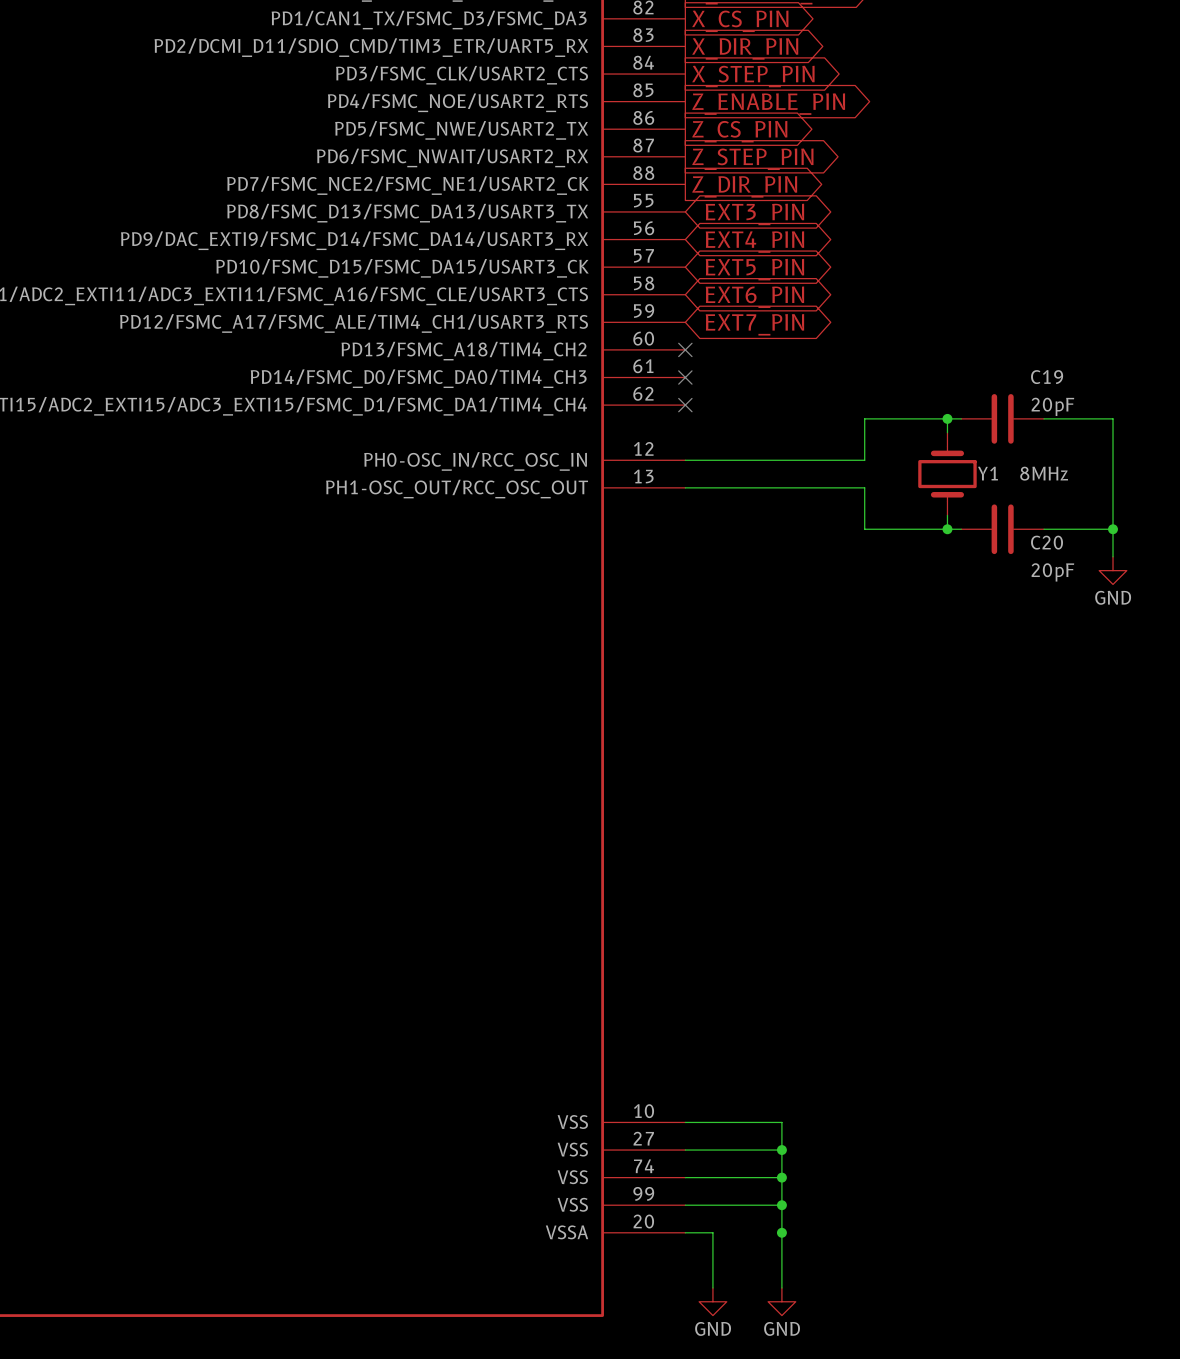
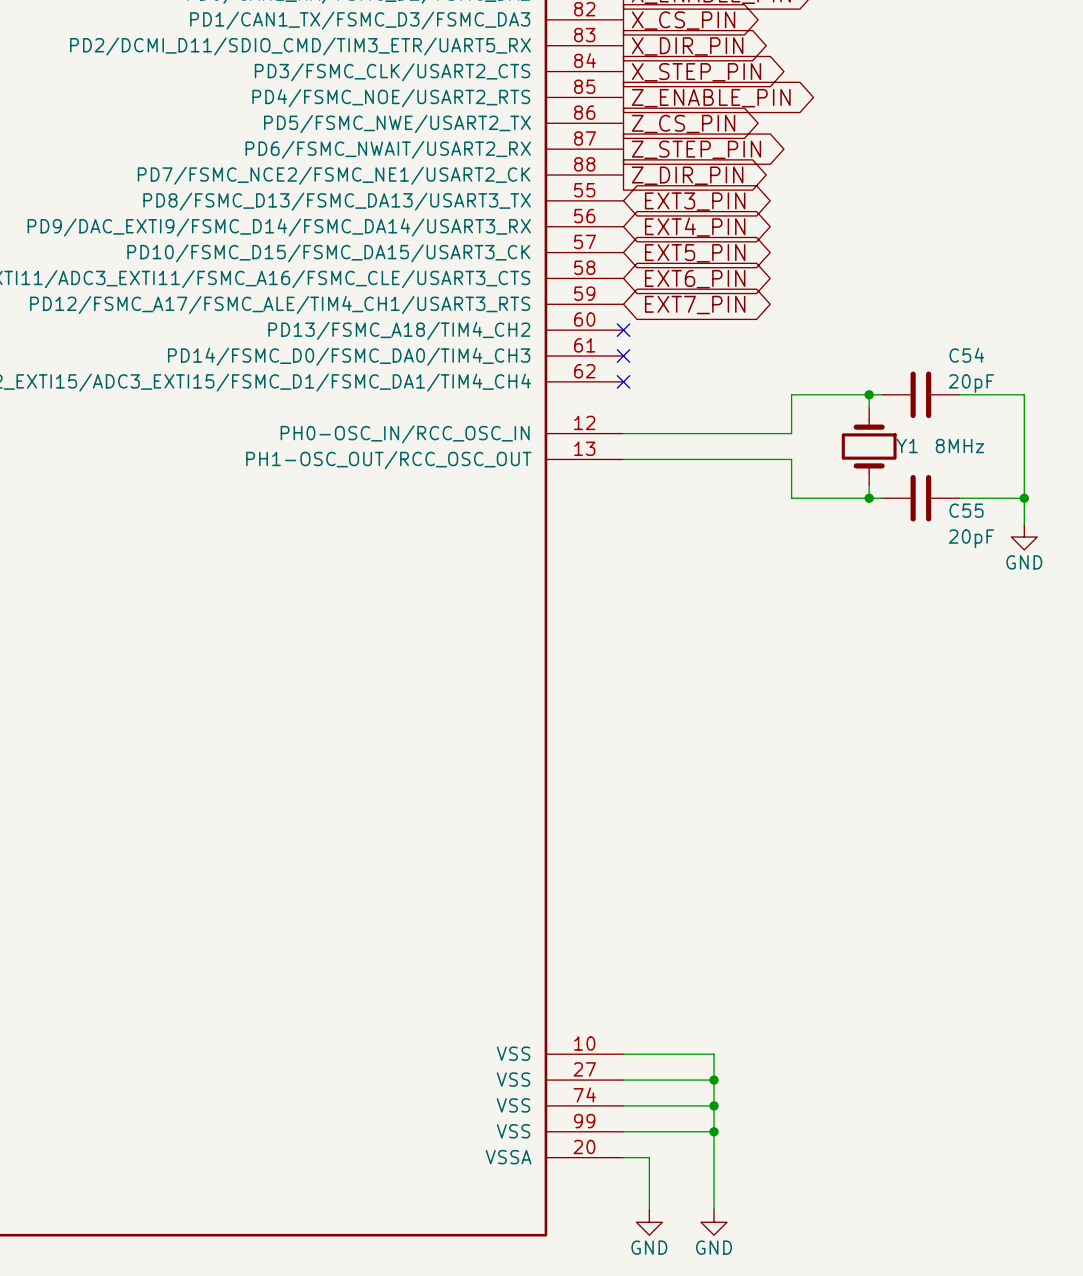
C19 name: C19 (1047, 377) -> C54 (966, 355)
C20 name: C20 (1047, 542) -> C55 (966, 510)
junction: (781, 1232) -> none

